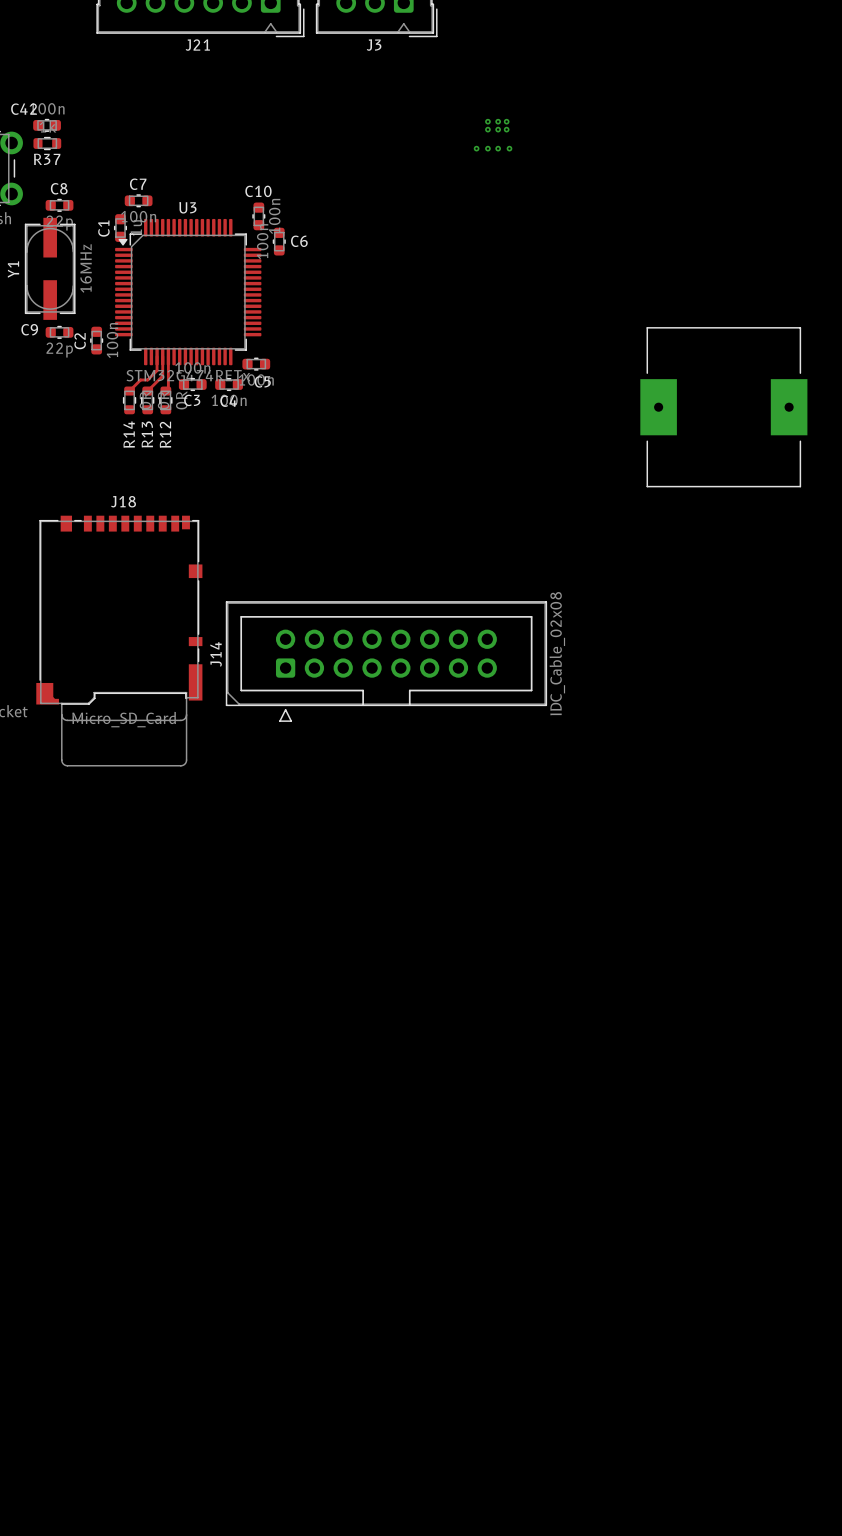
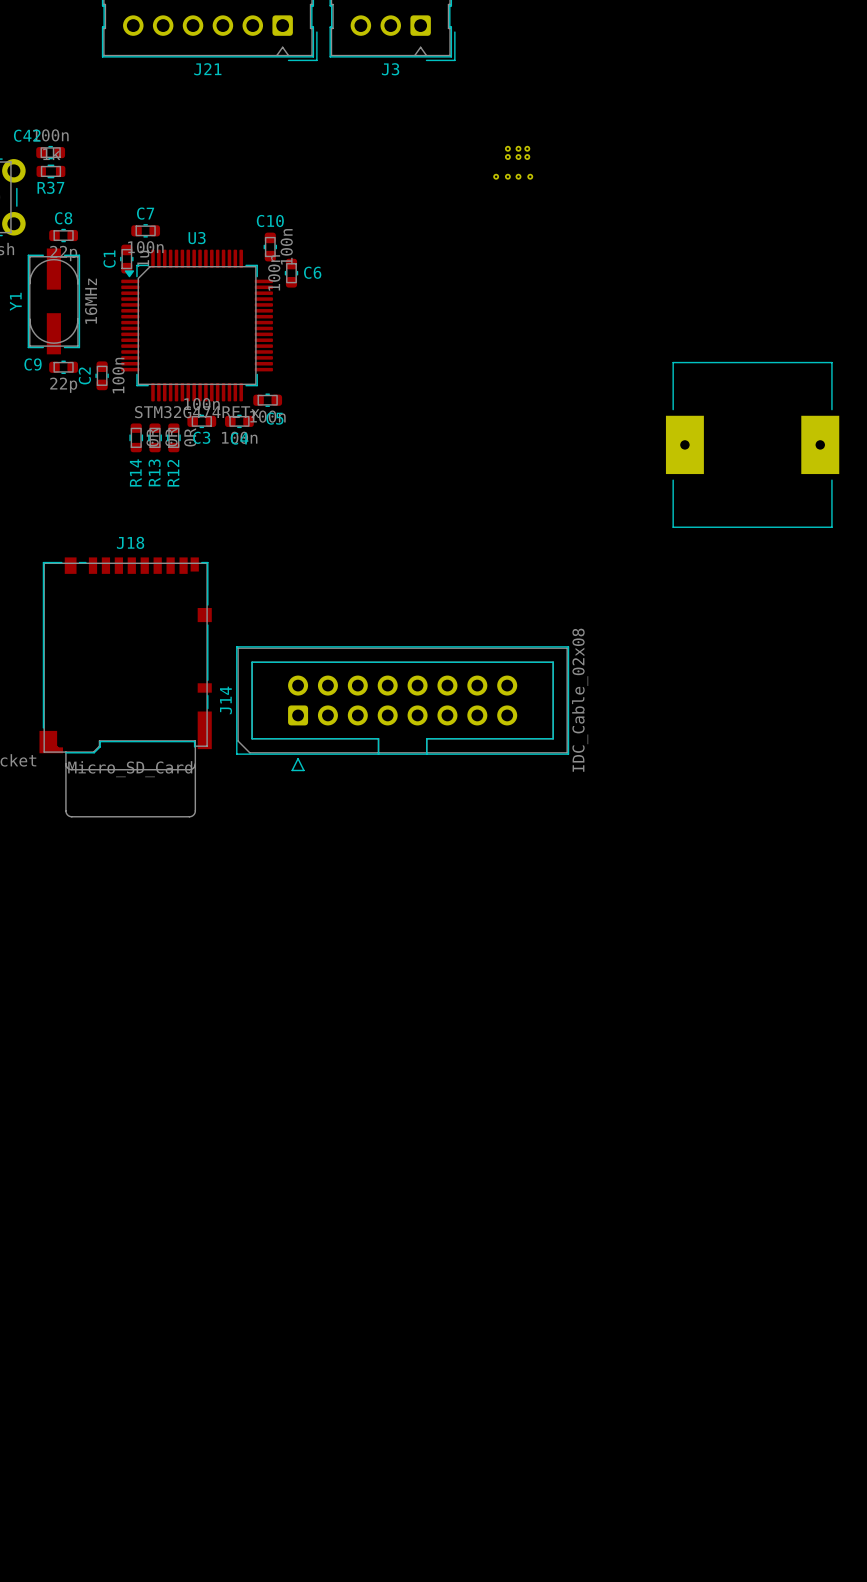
track: (157, 356) (157, 370) (147, 379) (140, 379) (129, 391) -> none
track: (162, 356) (162, 376) (147, 391) -> none
track: (168, 356) (168, 388) (165, 391) -> none

